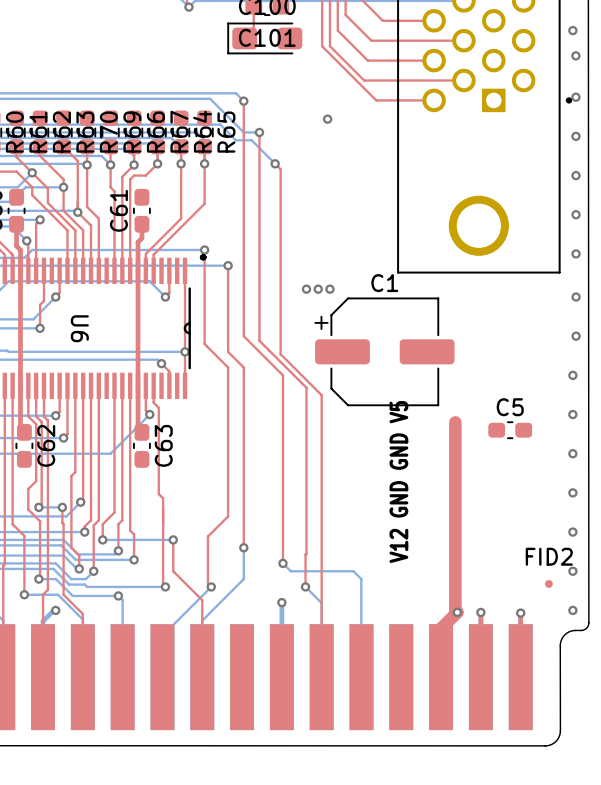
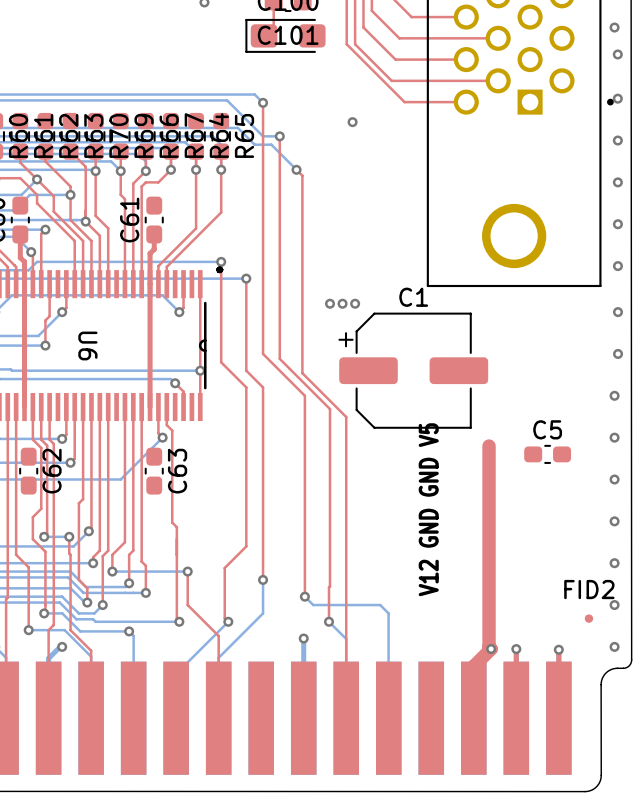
top track: (20, 385) (20, 428) (24, 432) -> none
top track: (138, 385) (138, 428) (141, 432) -> none

